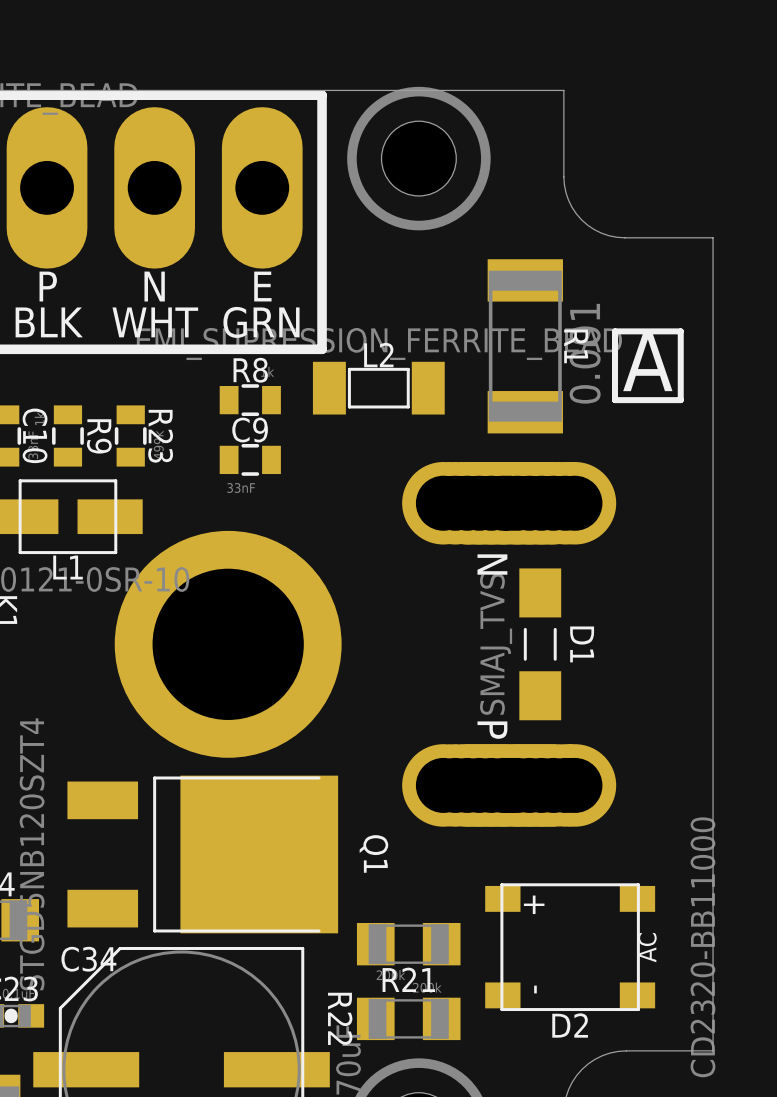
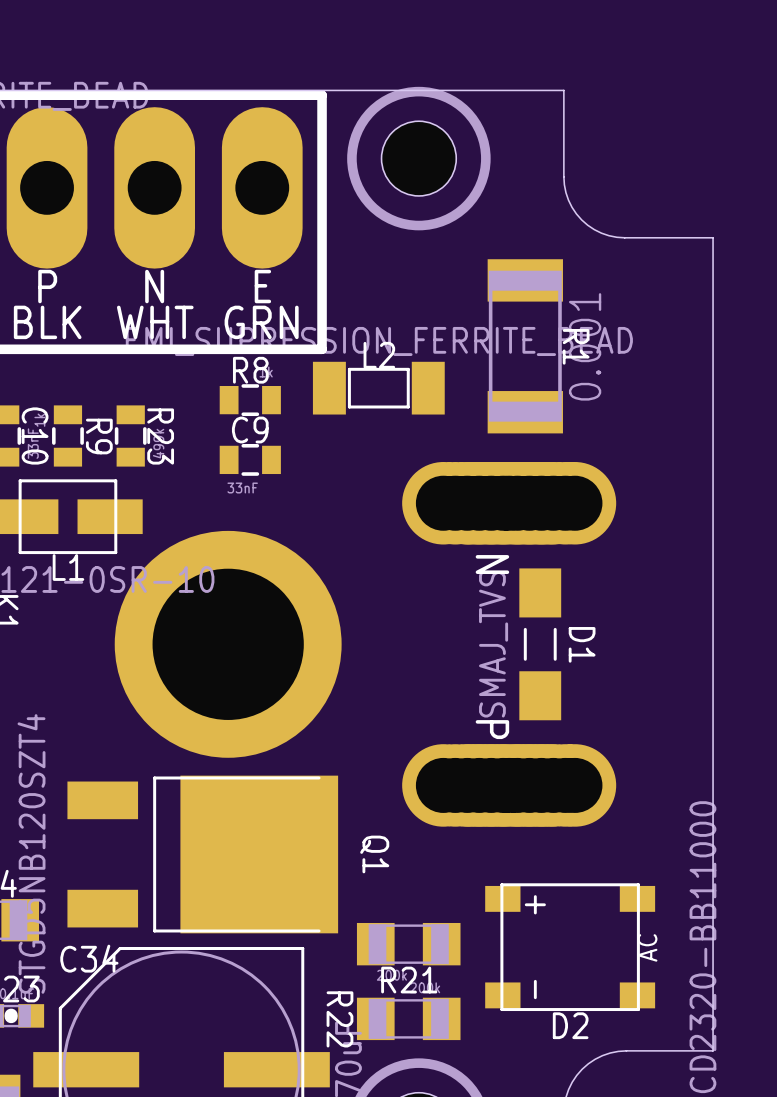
line: (614, 331) (614, 400) (680, 400) (680, 331) (614, 331) -> none
text: A (647, 361) -> none

